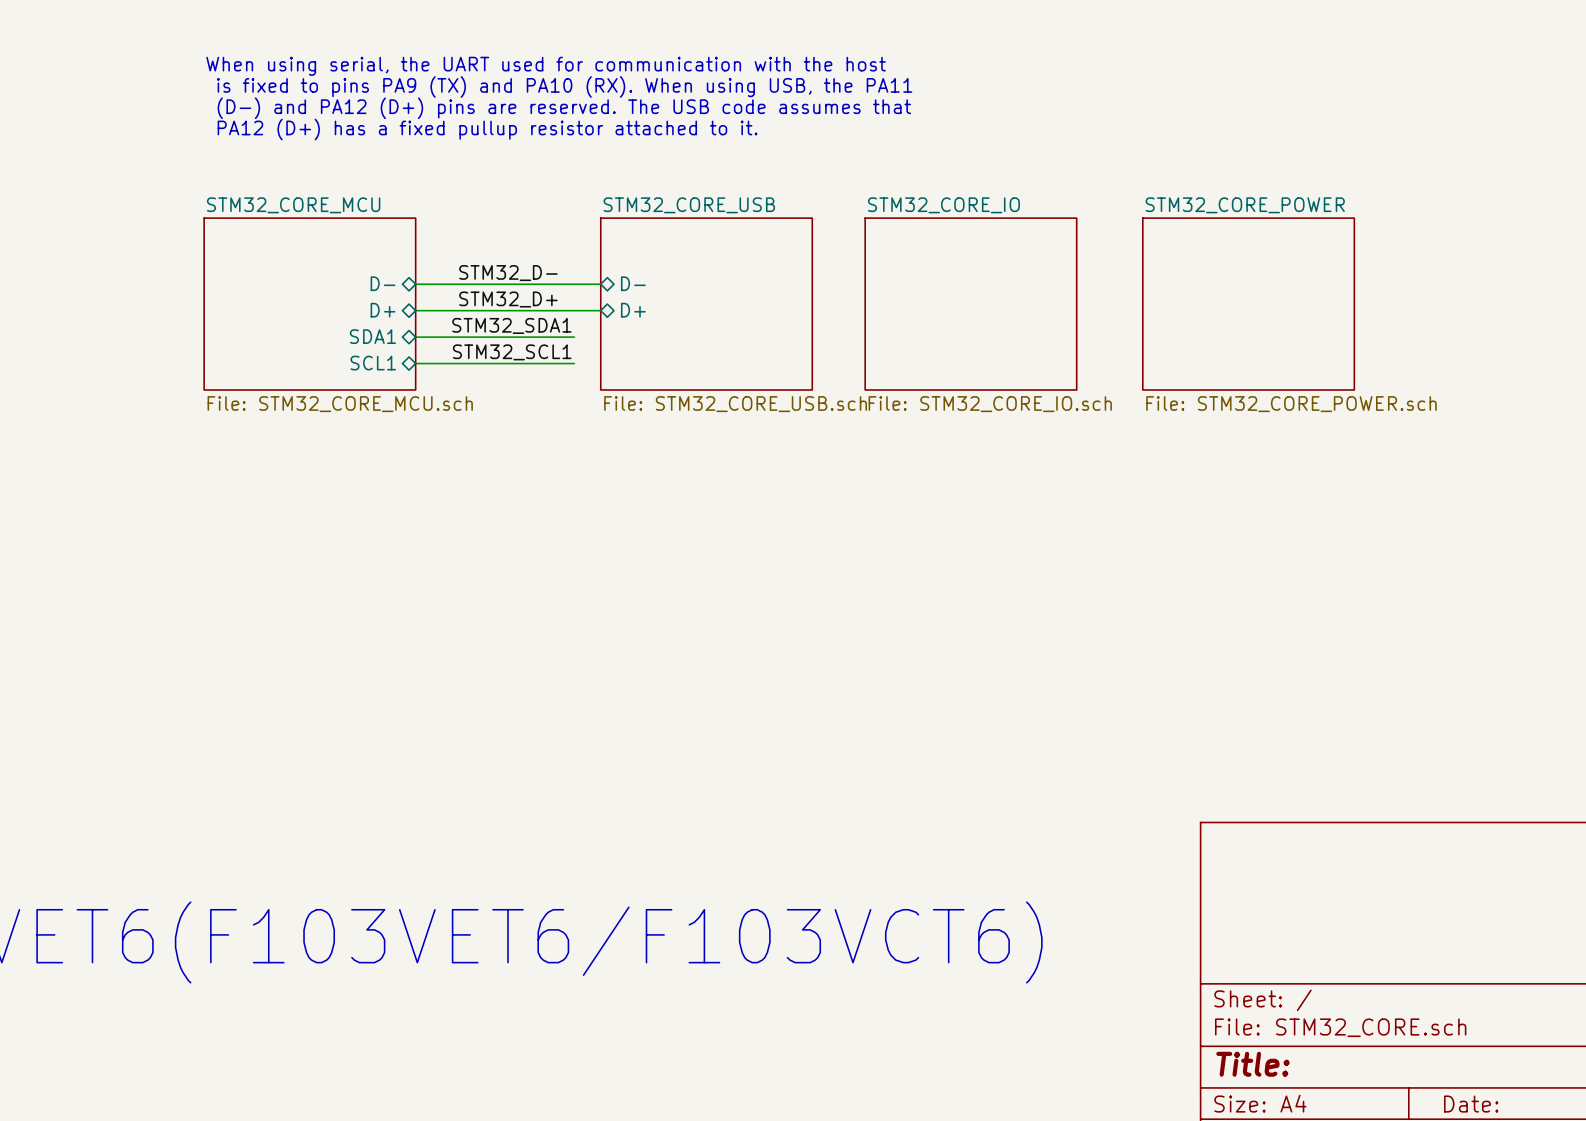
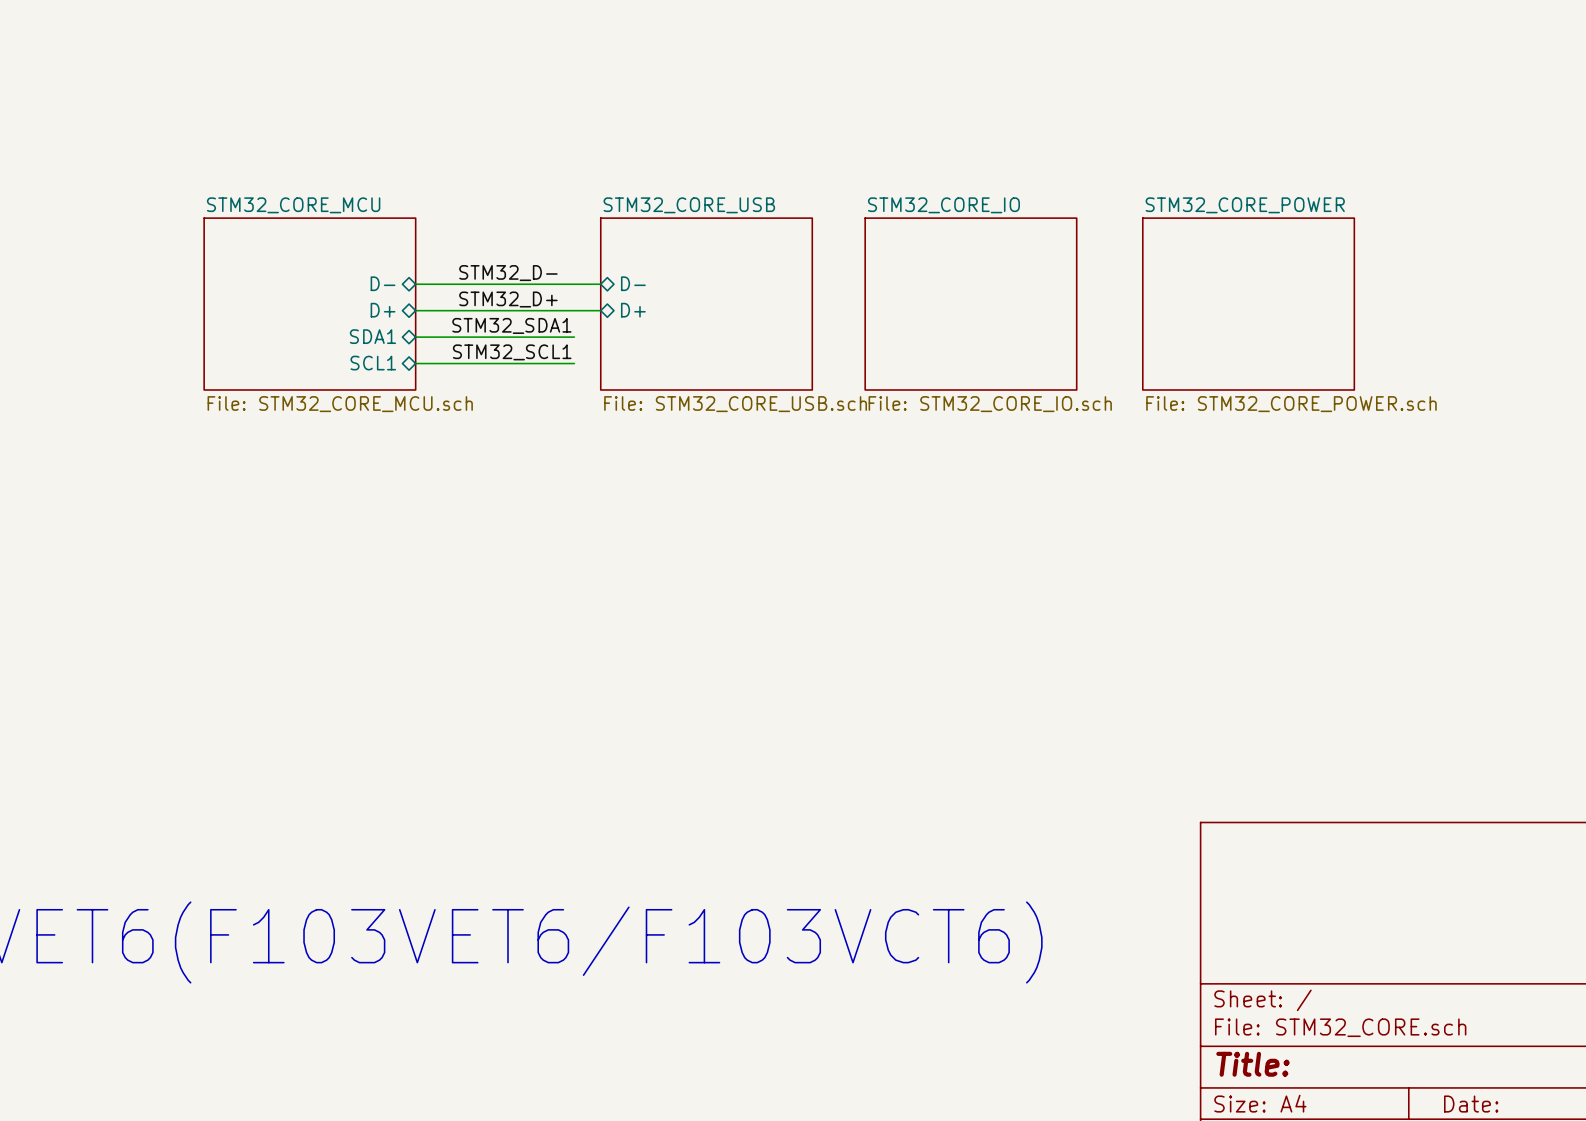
text: When using serial, the UART used for communication with the host (546, 66) -> none
text: is fixed to pins PA9 (TX) and PA10 (RX). When using USB, the PA11 (564, 86) -> none
text: (D-) and PA12 (D+) pins are reserved. The USB code assumes that (564, 108) -> none
text: PA12 (D+) has a fixed pullup resistor attached to it. (487, 129) -> none

